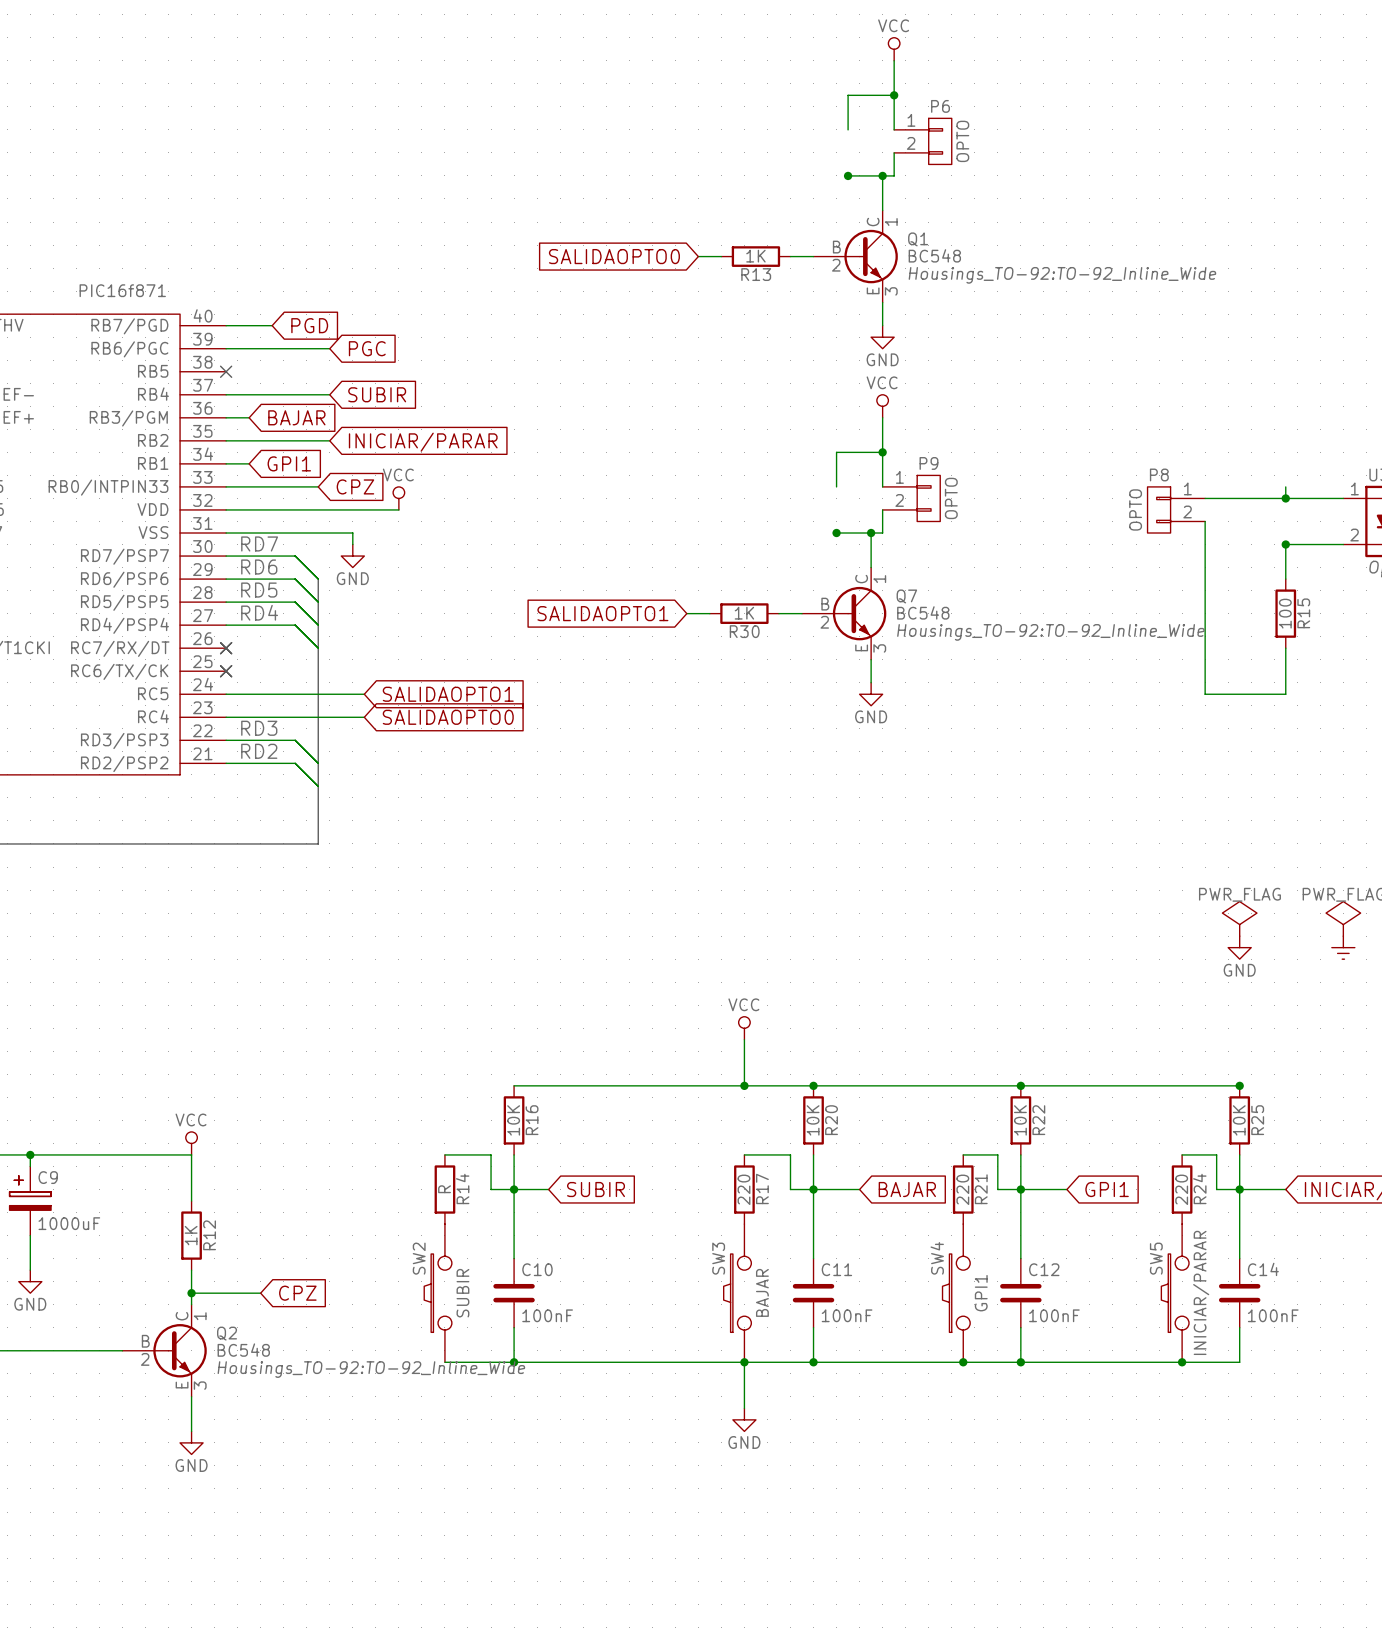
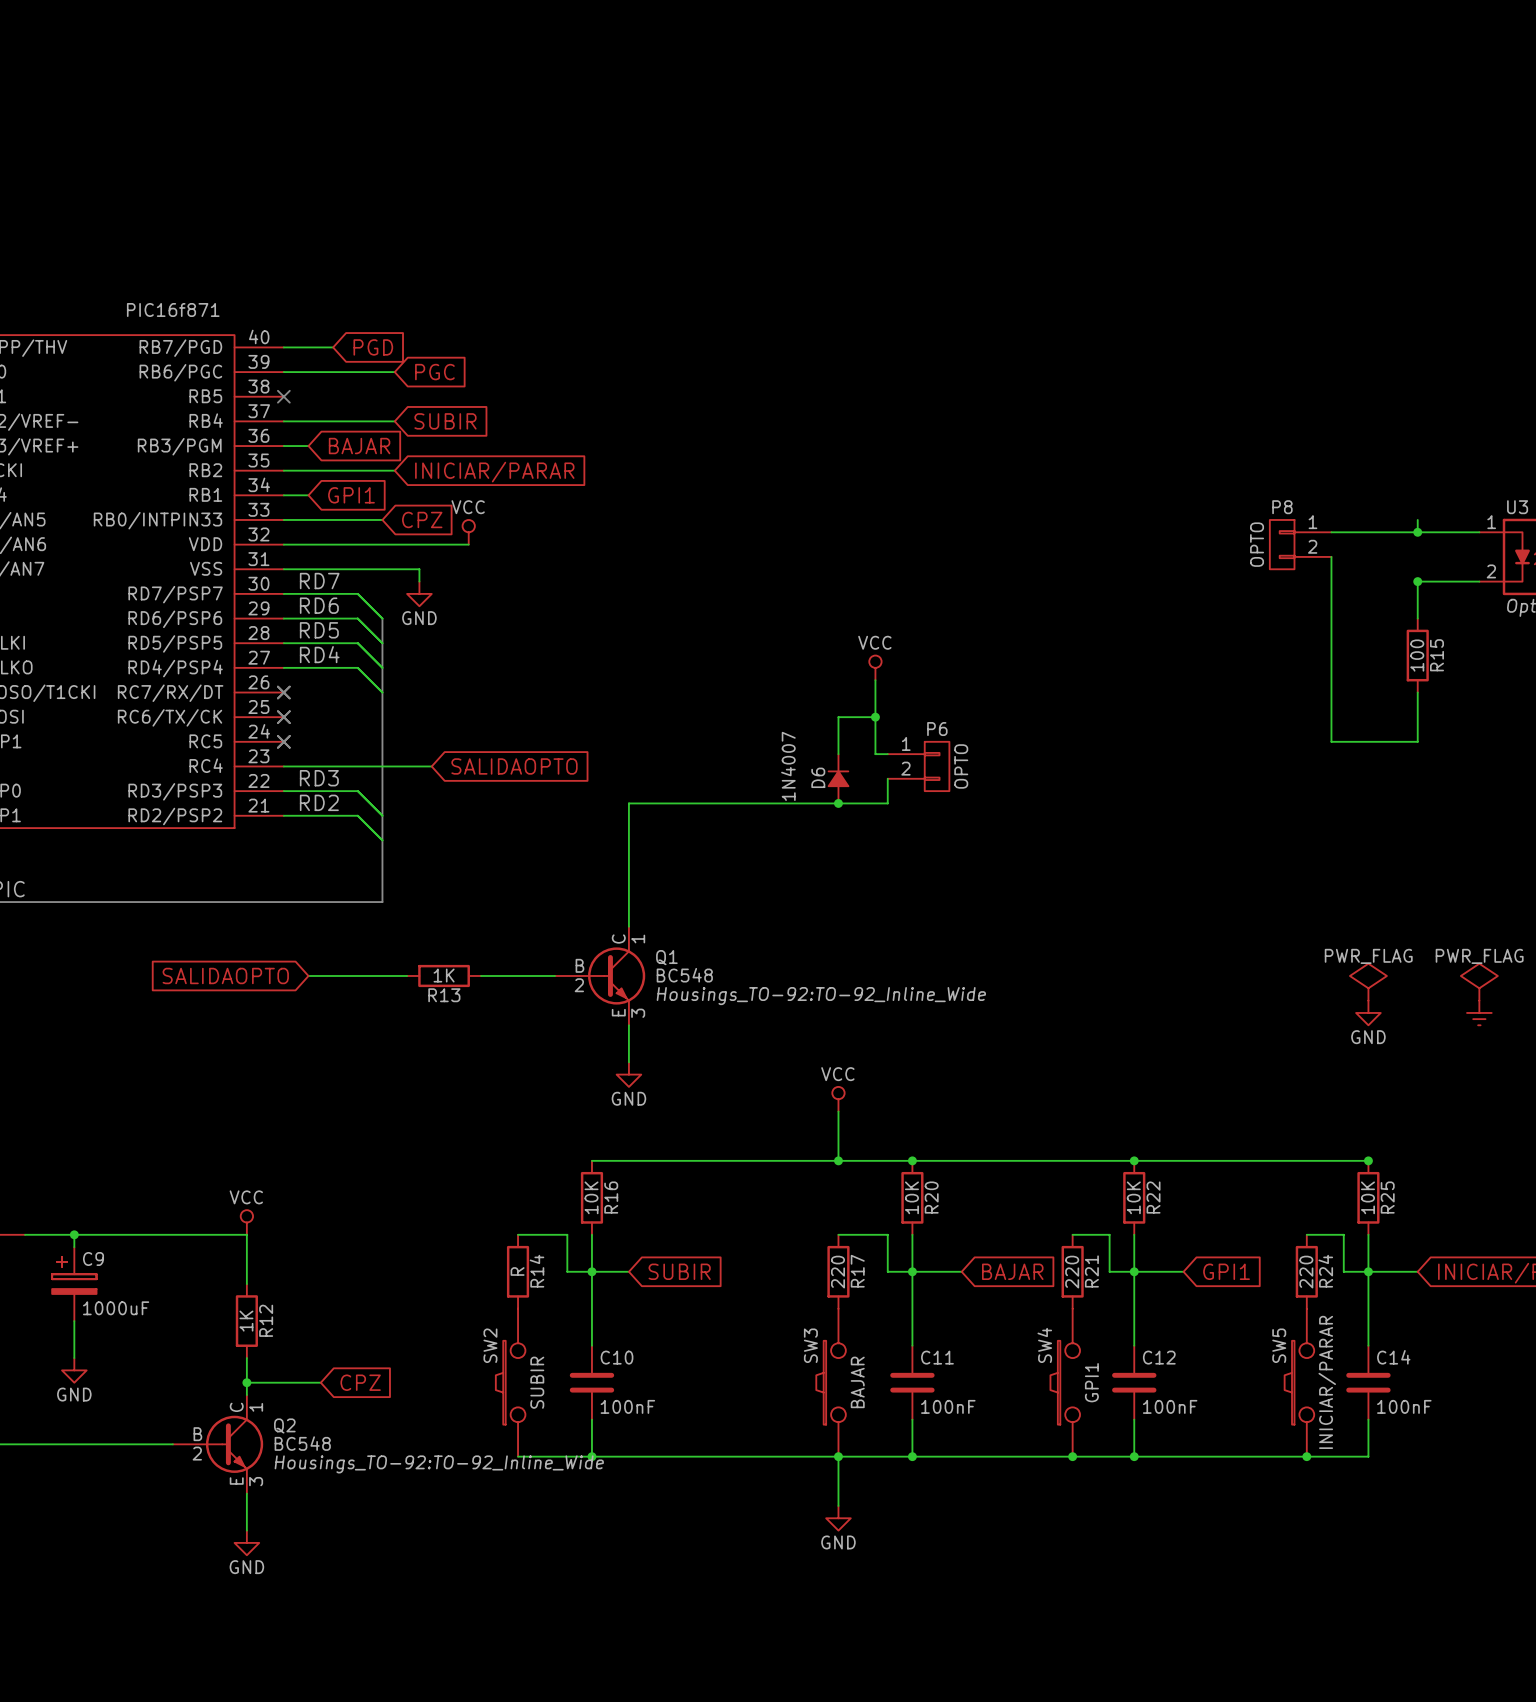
power symbol: VCC (894, 49) -> none
wire: (894, 60) (894, 129) -> none
wire: (894, 95) (848, 95) (848, 129) -> none
junction: (894, 95) -> none
P6 position: (922, 141) -> (918, 766)
wire: (894, 152) (894, 175) (848, 175) -> none
junction: (848, 175) -> none
wire: (882, 175) (882, 210) -> none
junction: (882, 175) -> none
global label: SALIDAOPTO0 (614, 256) -> none
wire: (698, 256) (721, 256) -> none
R13 position: (755, 256) -> (444, 975)
wire: (790, 256) (813, 256) -> none
Q1 position: (855, 256) -> (600, 975)
wire: (882, 302) (882, 325) -> none
power symbol: GND (882, 337) -> none
power symbol: VCC (882, 406) -> none
wire: (882, 417) (882, 486) -> none
wire: (882, 452) (836, 452) (836, 486) -> none
junction: (882, 452) -> none
P9: OPTO (911, 498) -> none
wire: (882, 509) (882, 533) (836, 533) -> none
junction: (836, 533) -> none
wire: (871, 533) (871, 567) -> none
junction: (871, 533) -> none
global label: SALIDAOPTO1 (602, 613) -> none
wire: (686, 613) (709, 613) -> none
R30: 1K (744, 613) -> none
wire: (778, 613) (802, 613) -> none
Q7: BC548 (844, 613) -> none
power symbol: none -> VCC (875, 667)
wire: none -> (875, 680) (875, 754) (887, 754)
wire: (871, 659) (871, 682) -> none
wire: none -> (875, 717) (838, 717) (838, 754)
junction: none -> (875, 717)
wire: (226, 694) (364, 694) -> none
no-connect mark: none -> (283, 741)
global label: SALIDAOPTO1 (448, 694) -> none
power symbol: GND (871, 694) -> none
global label: SALIDAOPTO0 (448, 717) -> SALIDAOPTO (514, 766)
D6: none -> 1N4007 (838, 778)
wire: none -> (887, 778) (887, 803) (628, 803) (628, 926)
junction: none -> (838, 803)
global label: none -> SALIDAOPTO (225, 975)
wire: none -> (308, 975) (407, 975)
wire: none -> (481, 975) (555, 975)
wire: none -> (628, 1025) (628, 1062)
power symbol: none -> GND (628, 1074)

